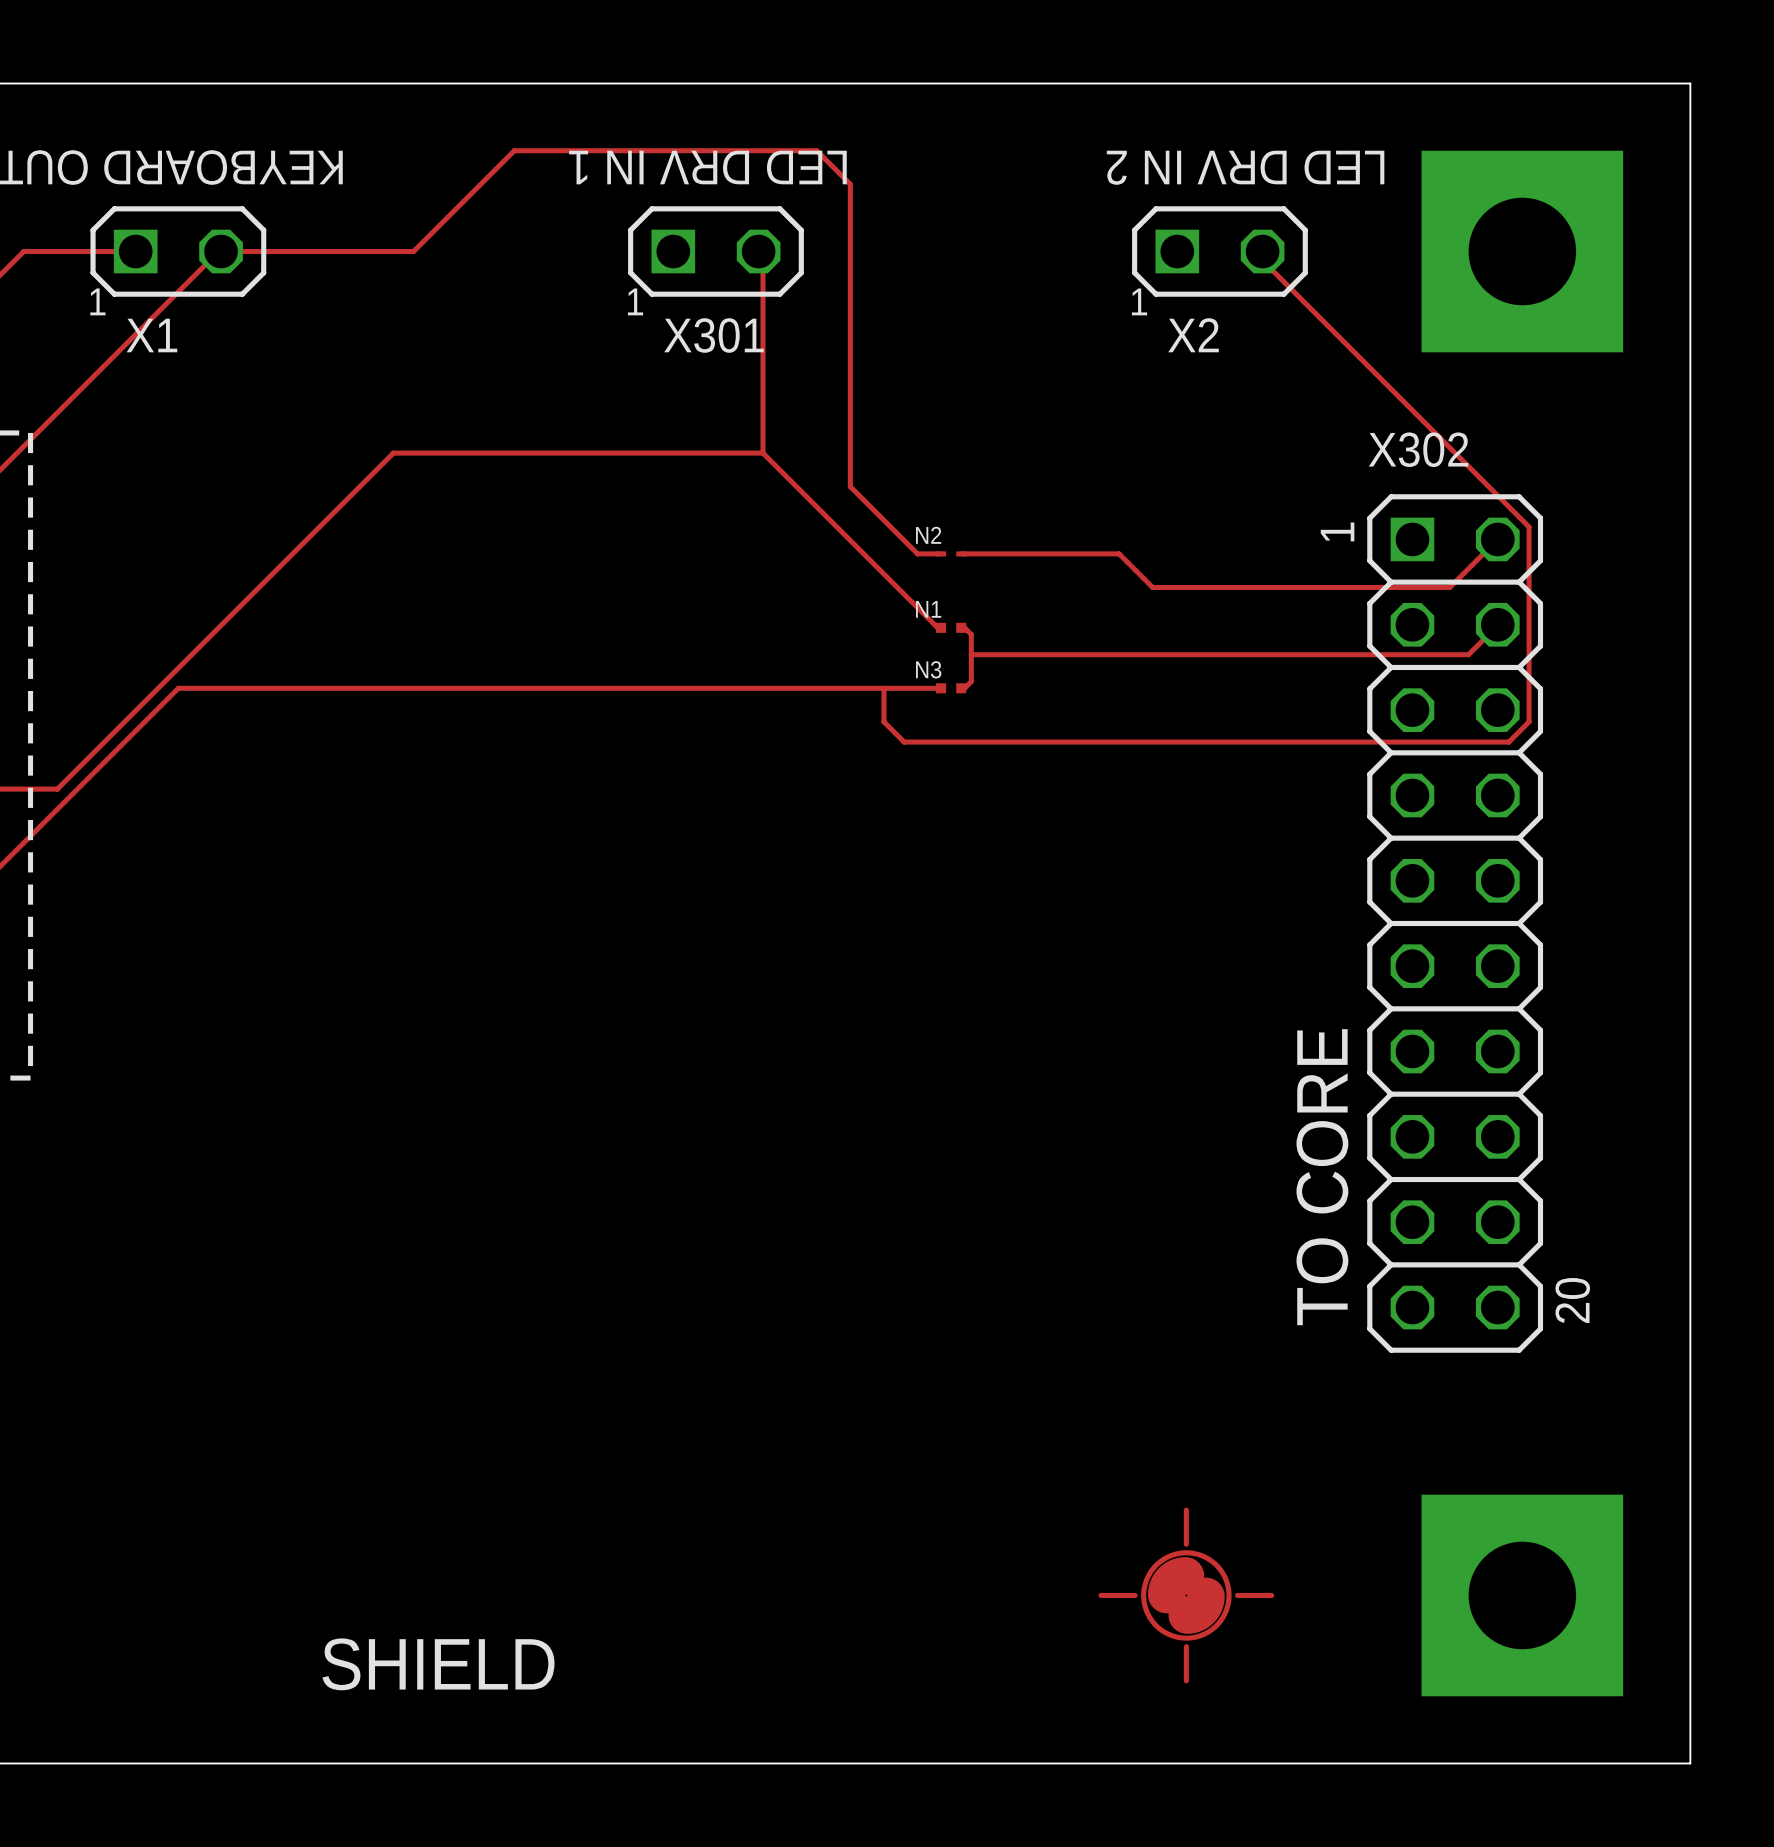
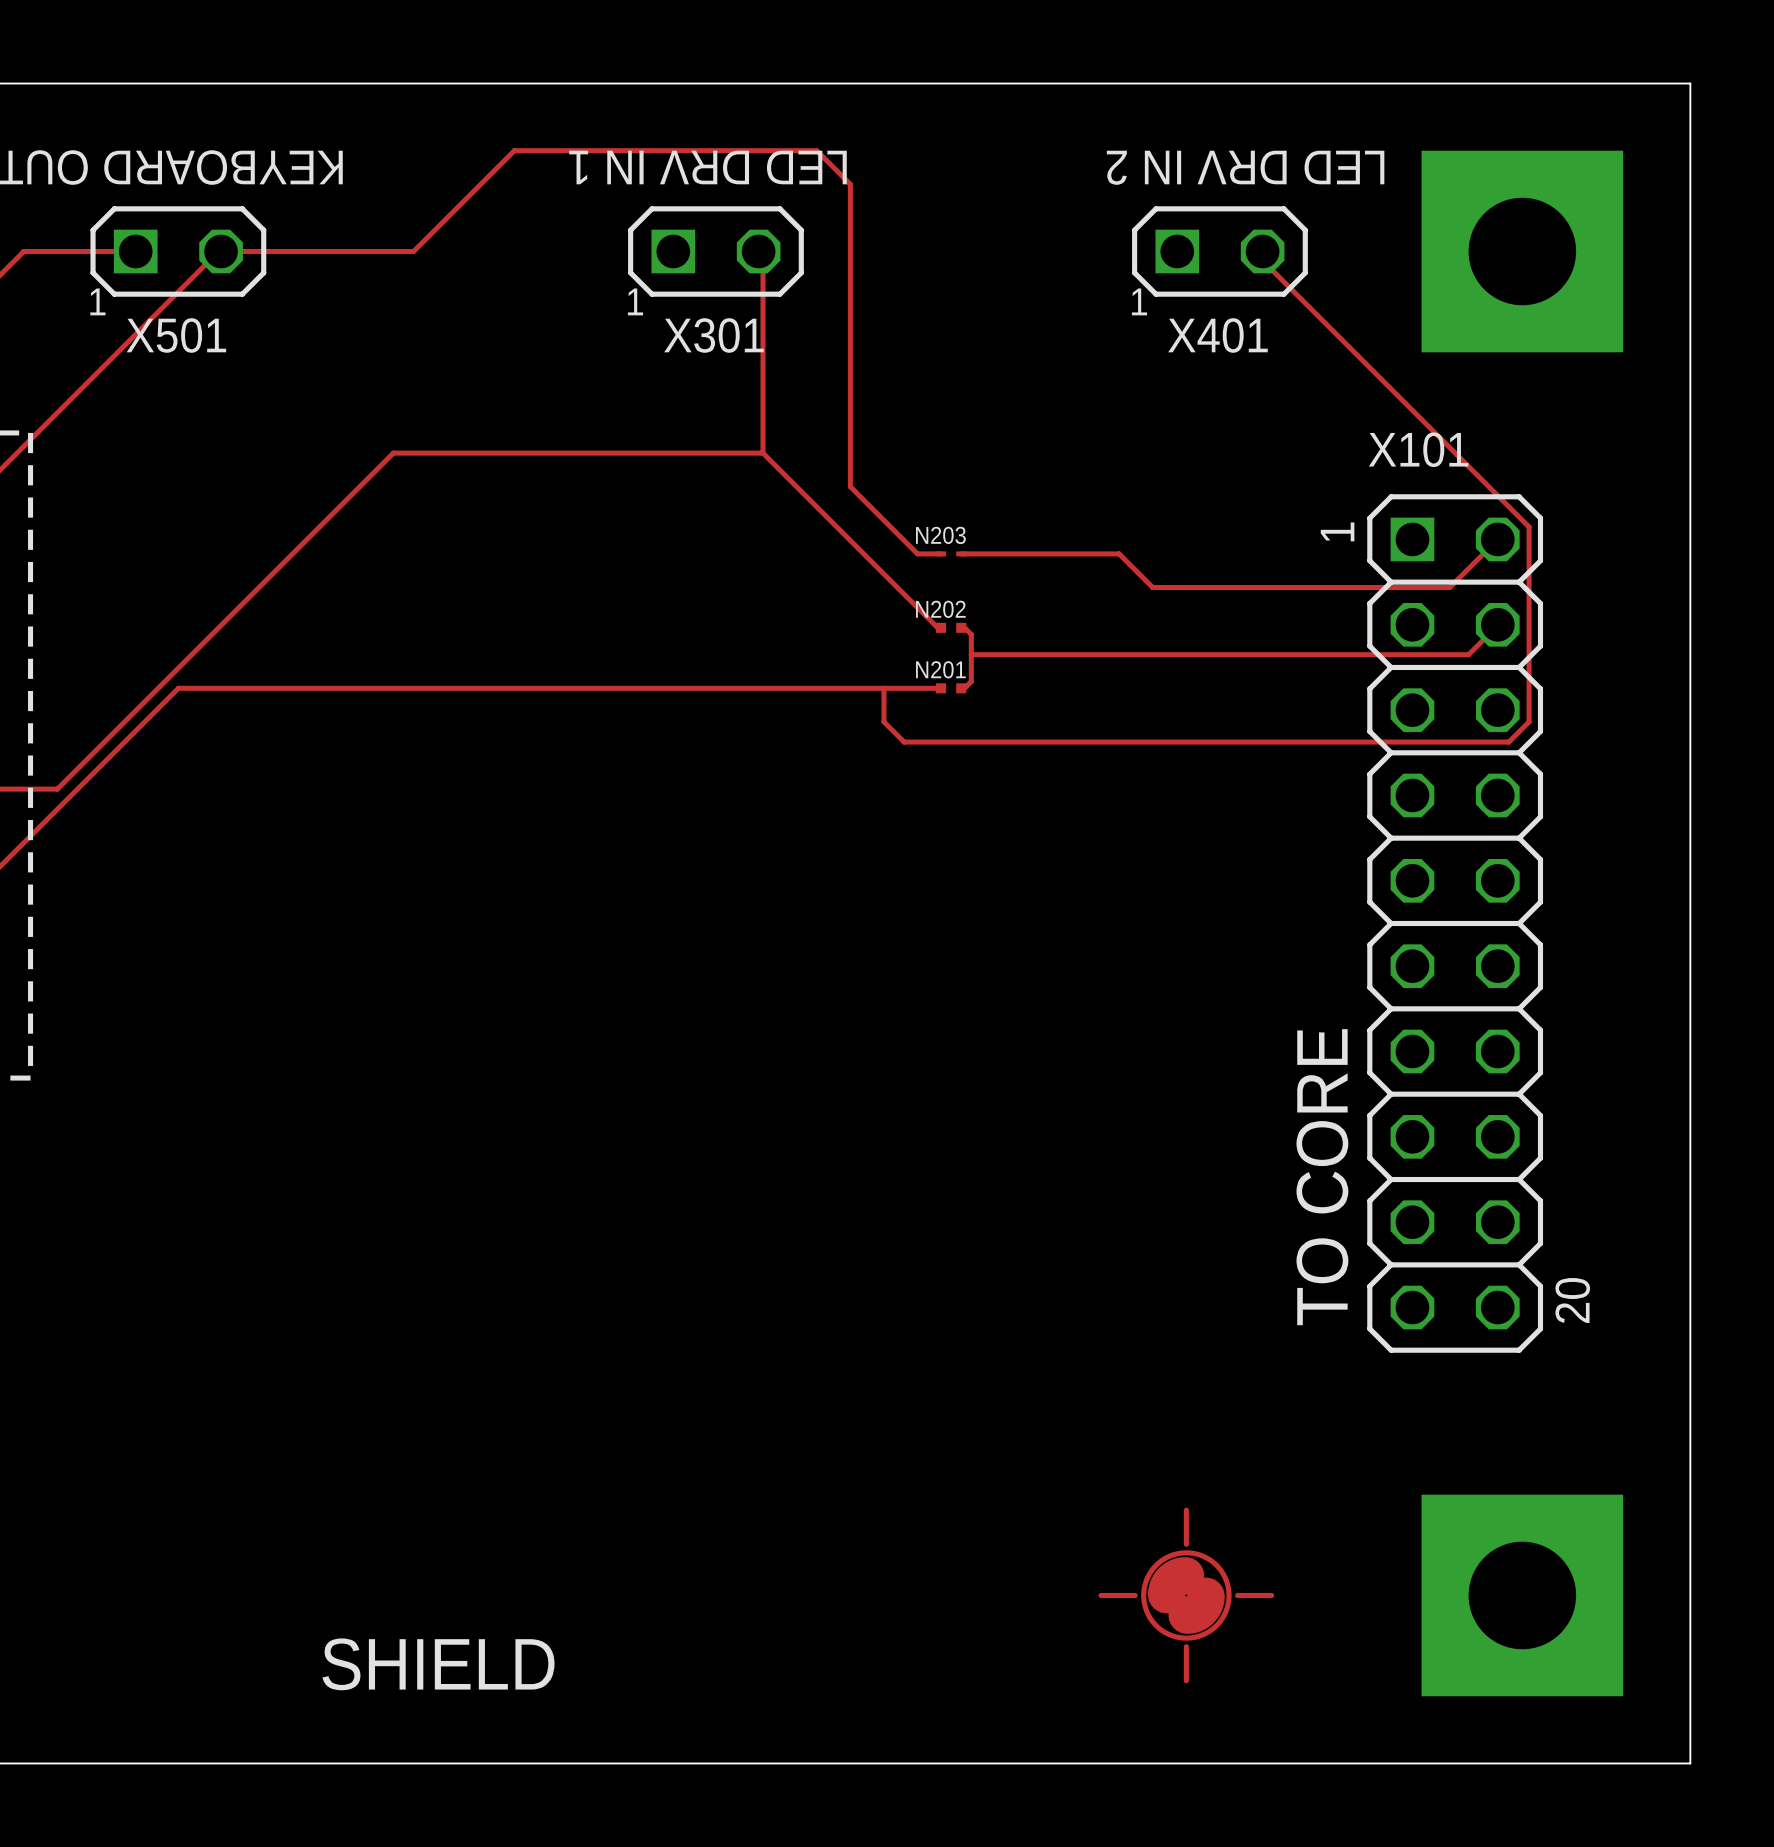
X1 name: X1 (151, 335) -> X501 (176, 335)
X2 name: X2 (1193, 335) -> X401 (1217, 335)
X302 name: X302 (1418, 449) -> X101 (1418, 449)
N2 name: N2 (928, 535) -> N203 (940, 535)
N1 name: N1 (928, 609) -> N202 (940, 609)
N3 name: N3 (928, 669) -> N201 (940, 669)

